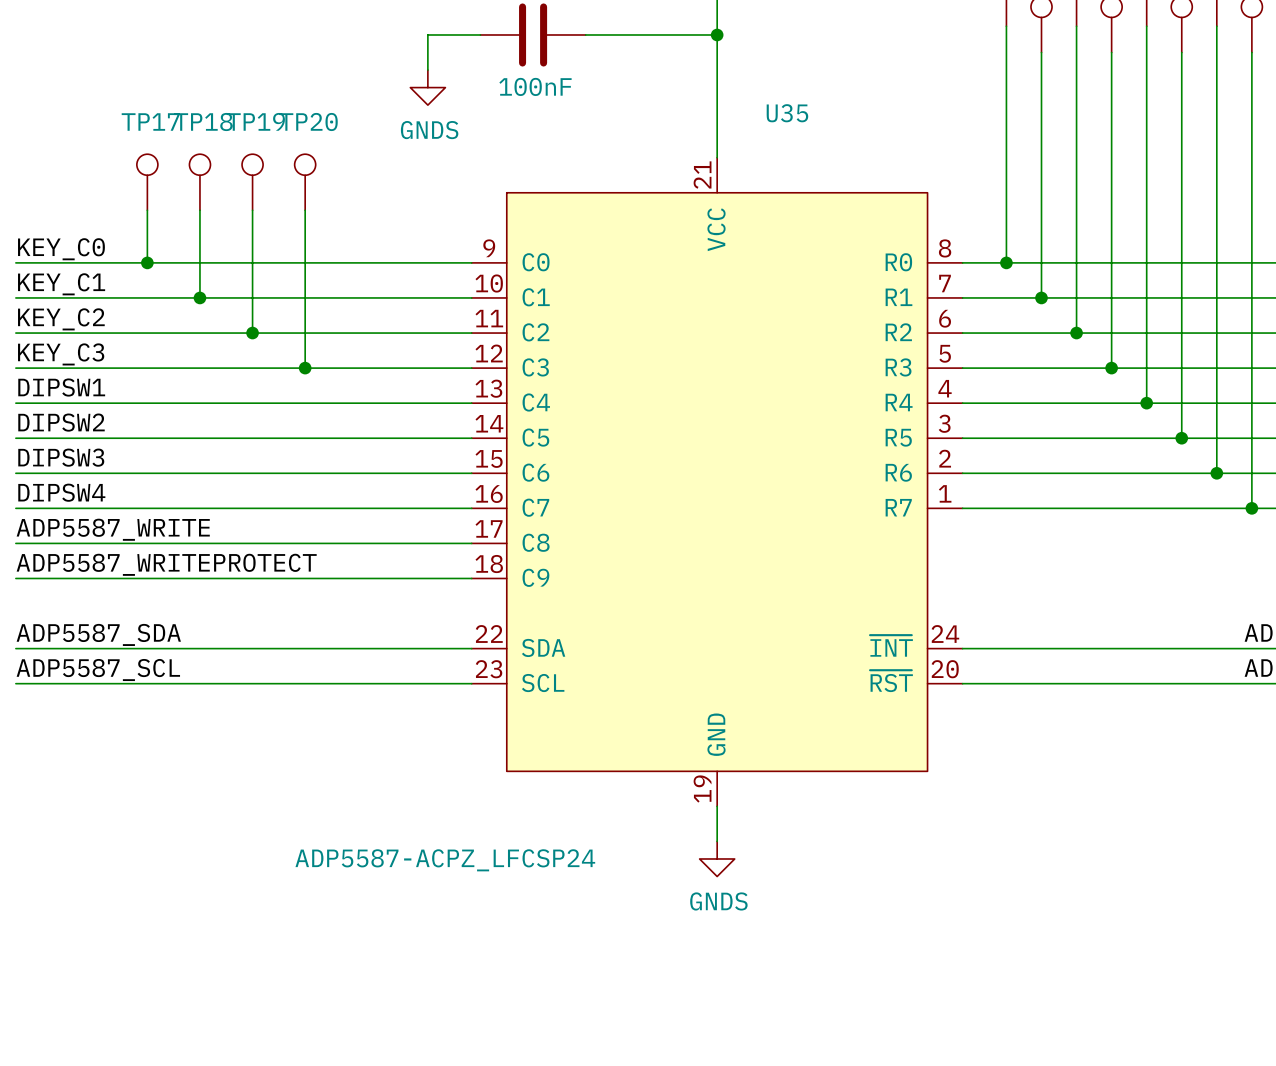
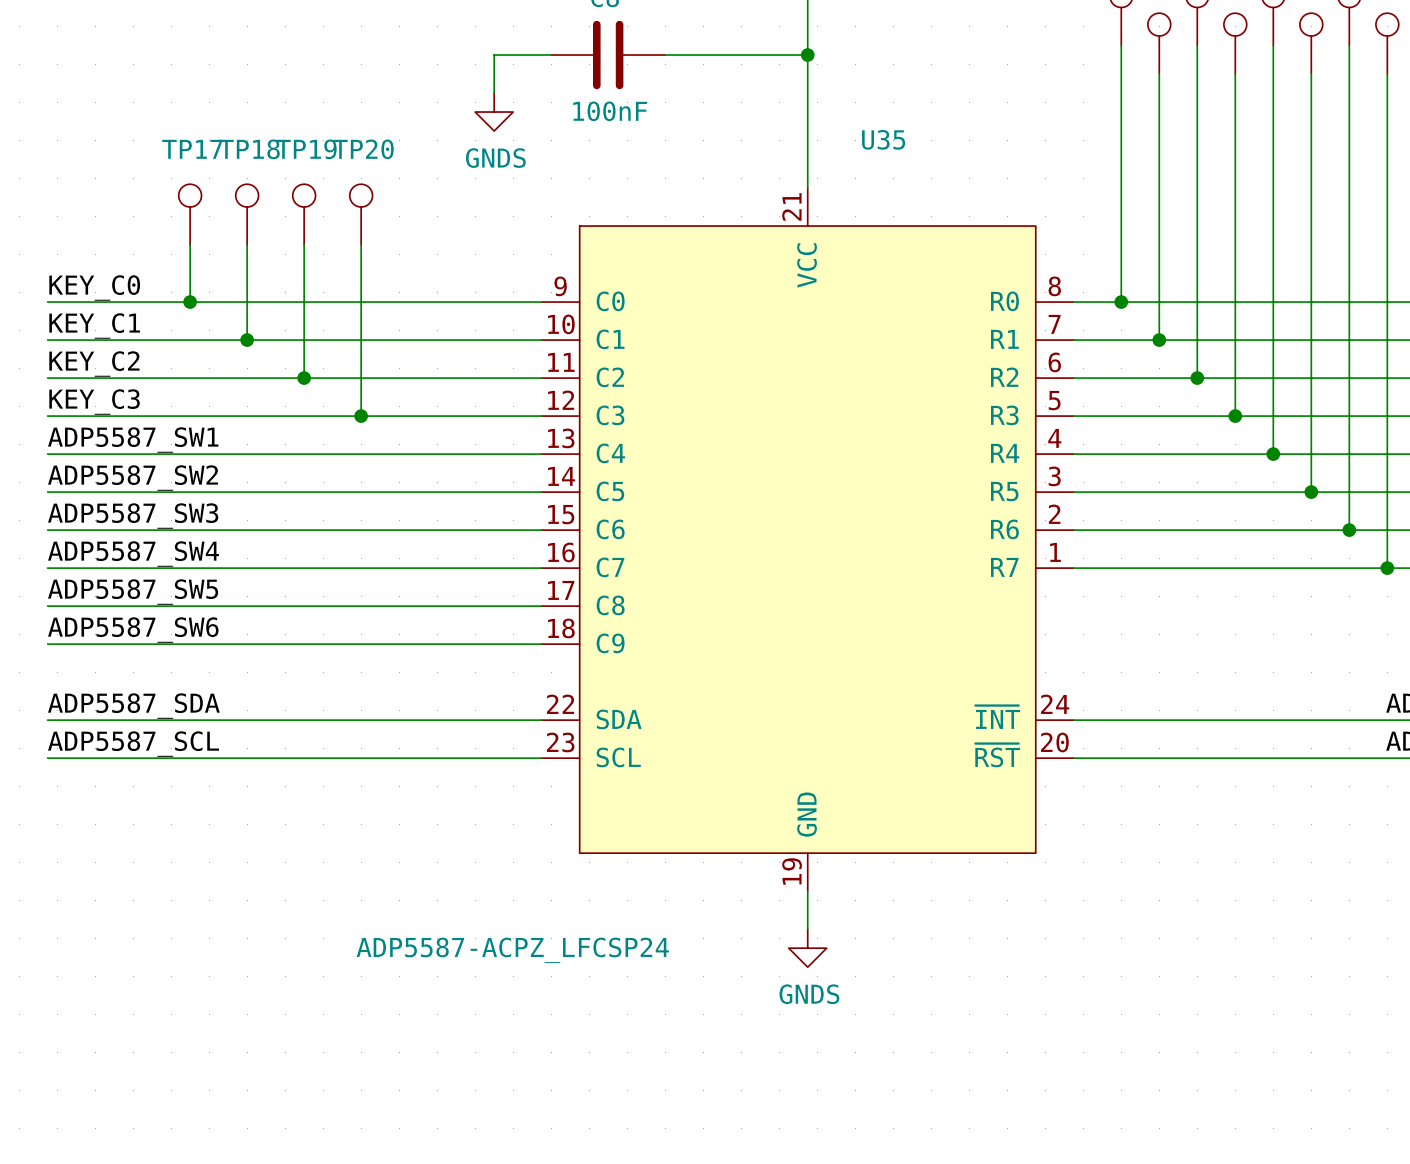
label: DIPSW1 (61, 387) -> ADP5587_SW1 (133, 440)
label: DIPSW2 (61, 422) -> ADP5587_SW2 (133, 478)
label: DIPSW3 (61, 457) -> ADP5587_SW3 (133, 516)
label: DIPSW4 (61, 492) -> ADP5587_SW4 (133, 554)
label: ADP5587_WRITE (113, 529) -> ADP5587_SW5 (133, 592)
label: ADP5587_WRITEPROTECT (166, 564) -> ADP5587_SW6 (133, 630)

